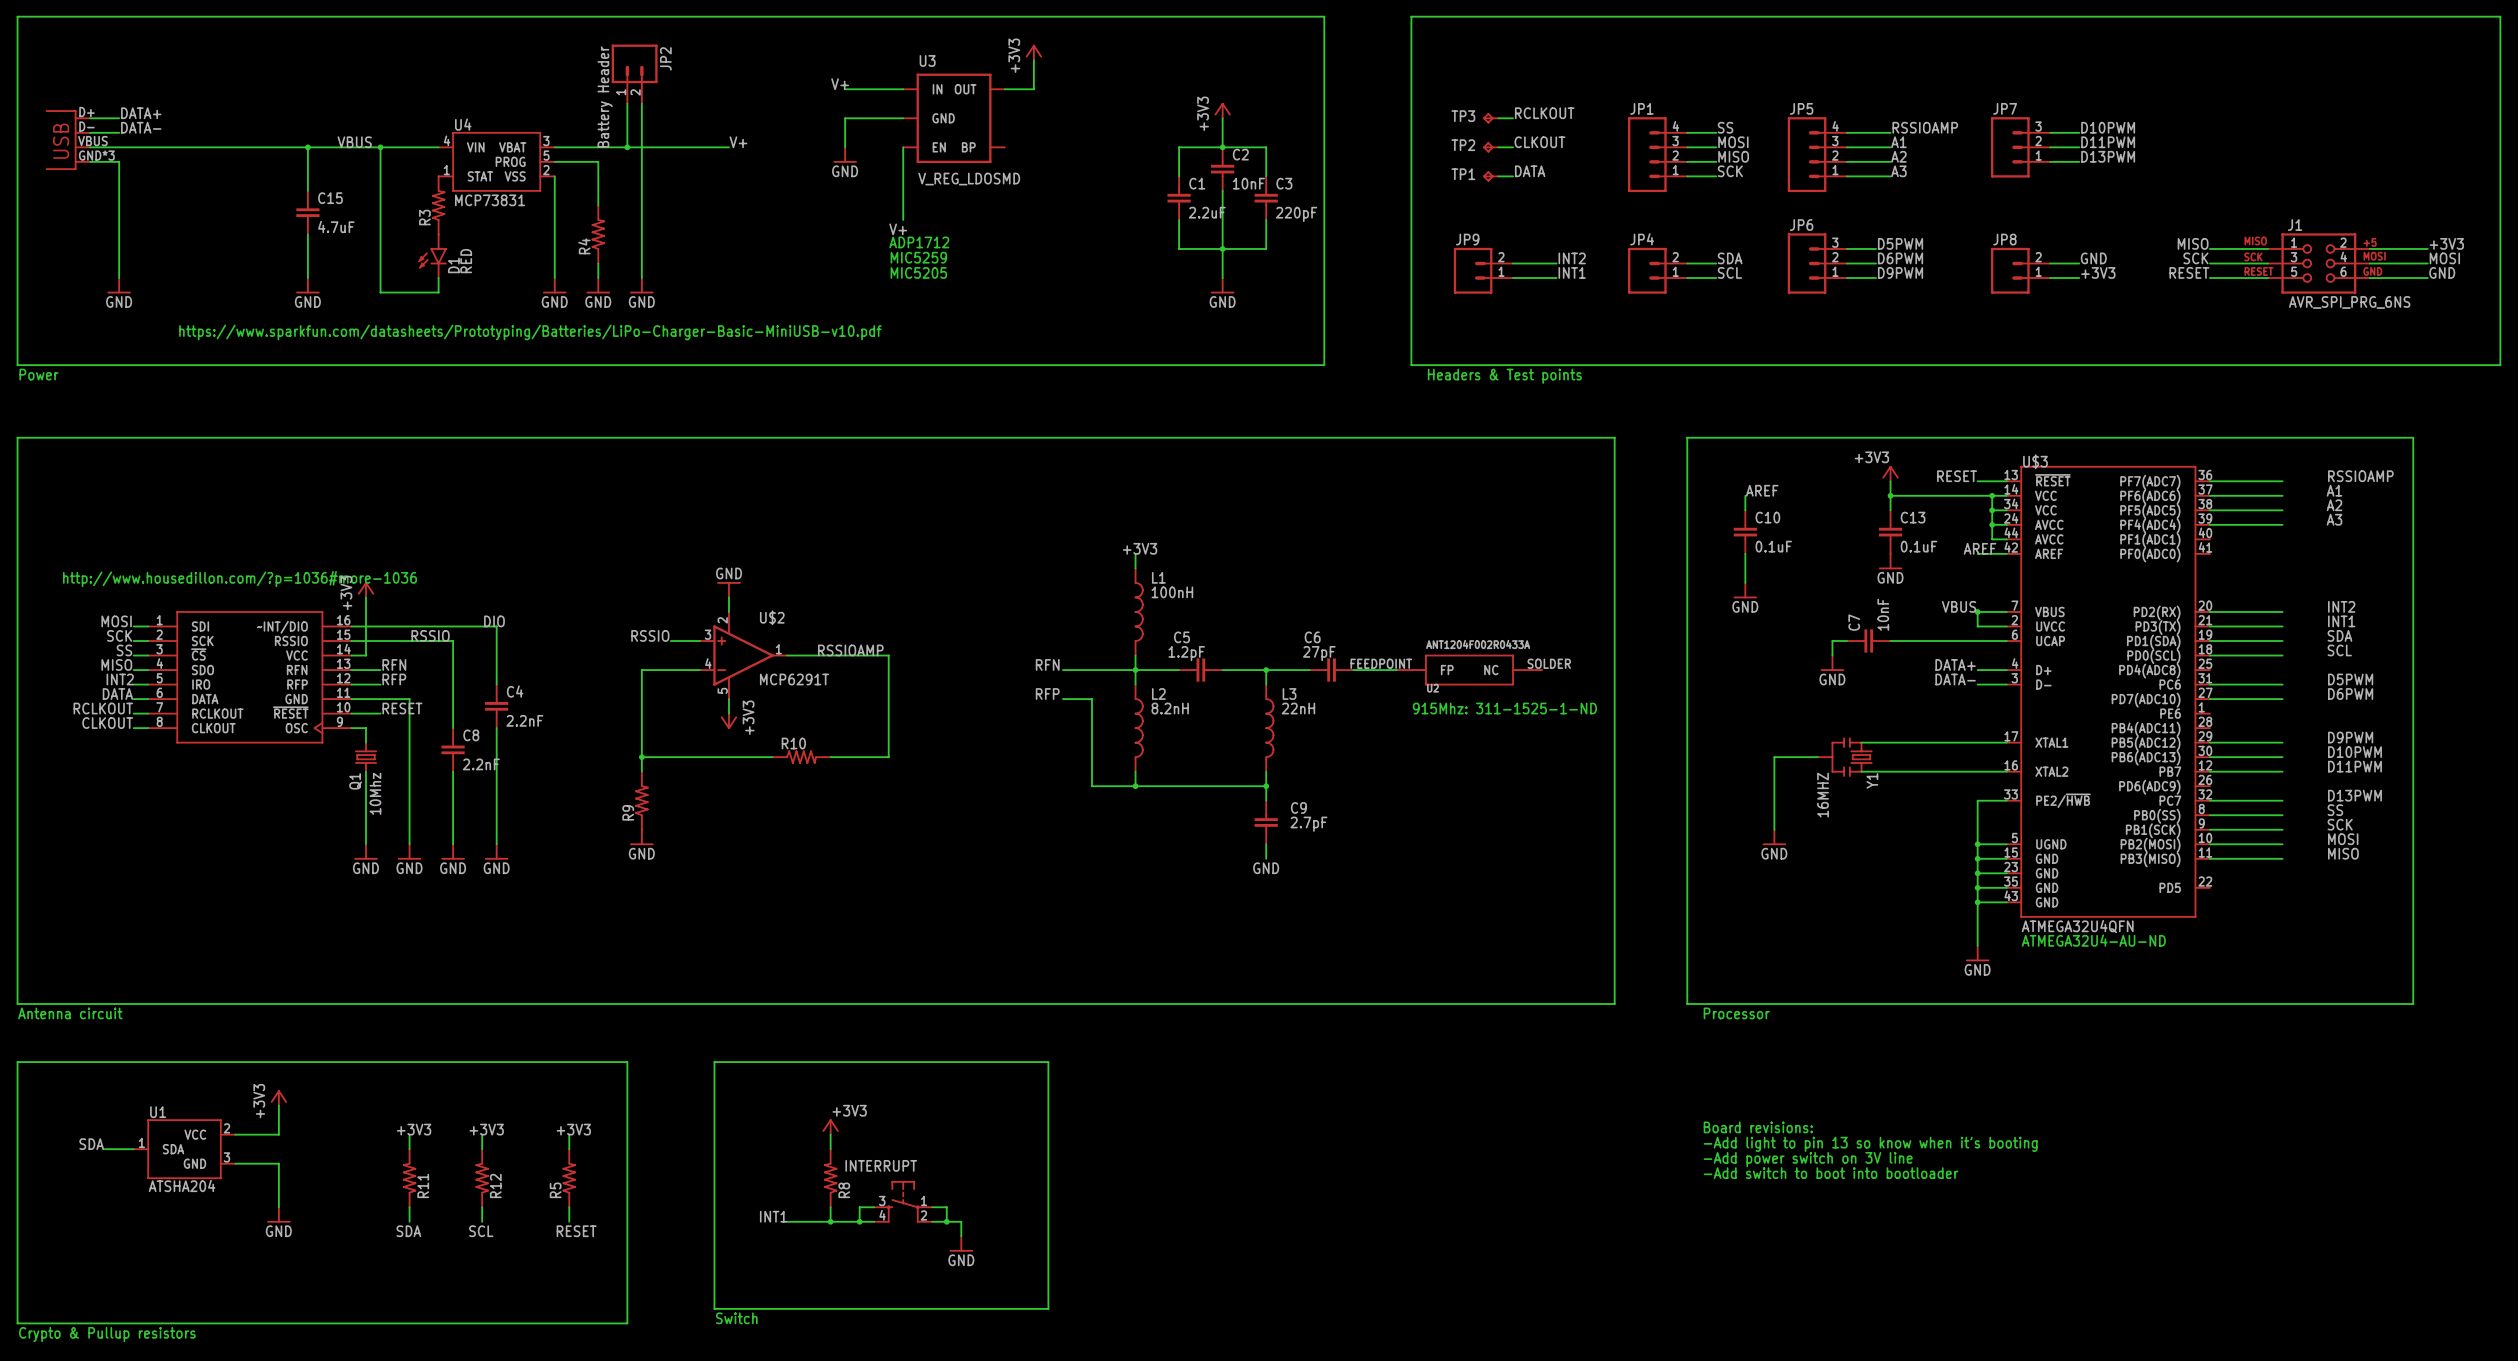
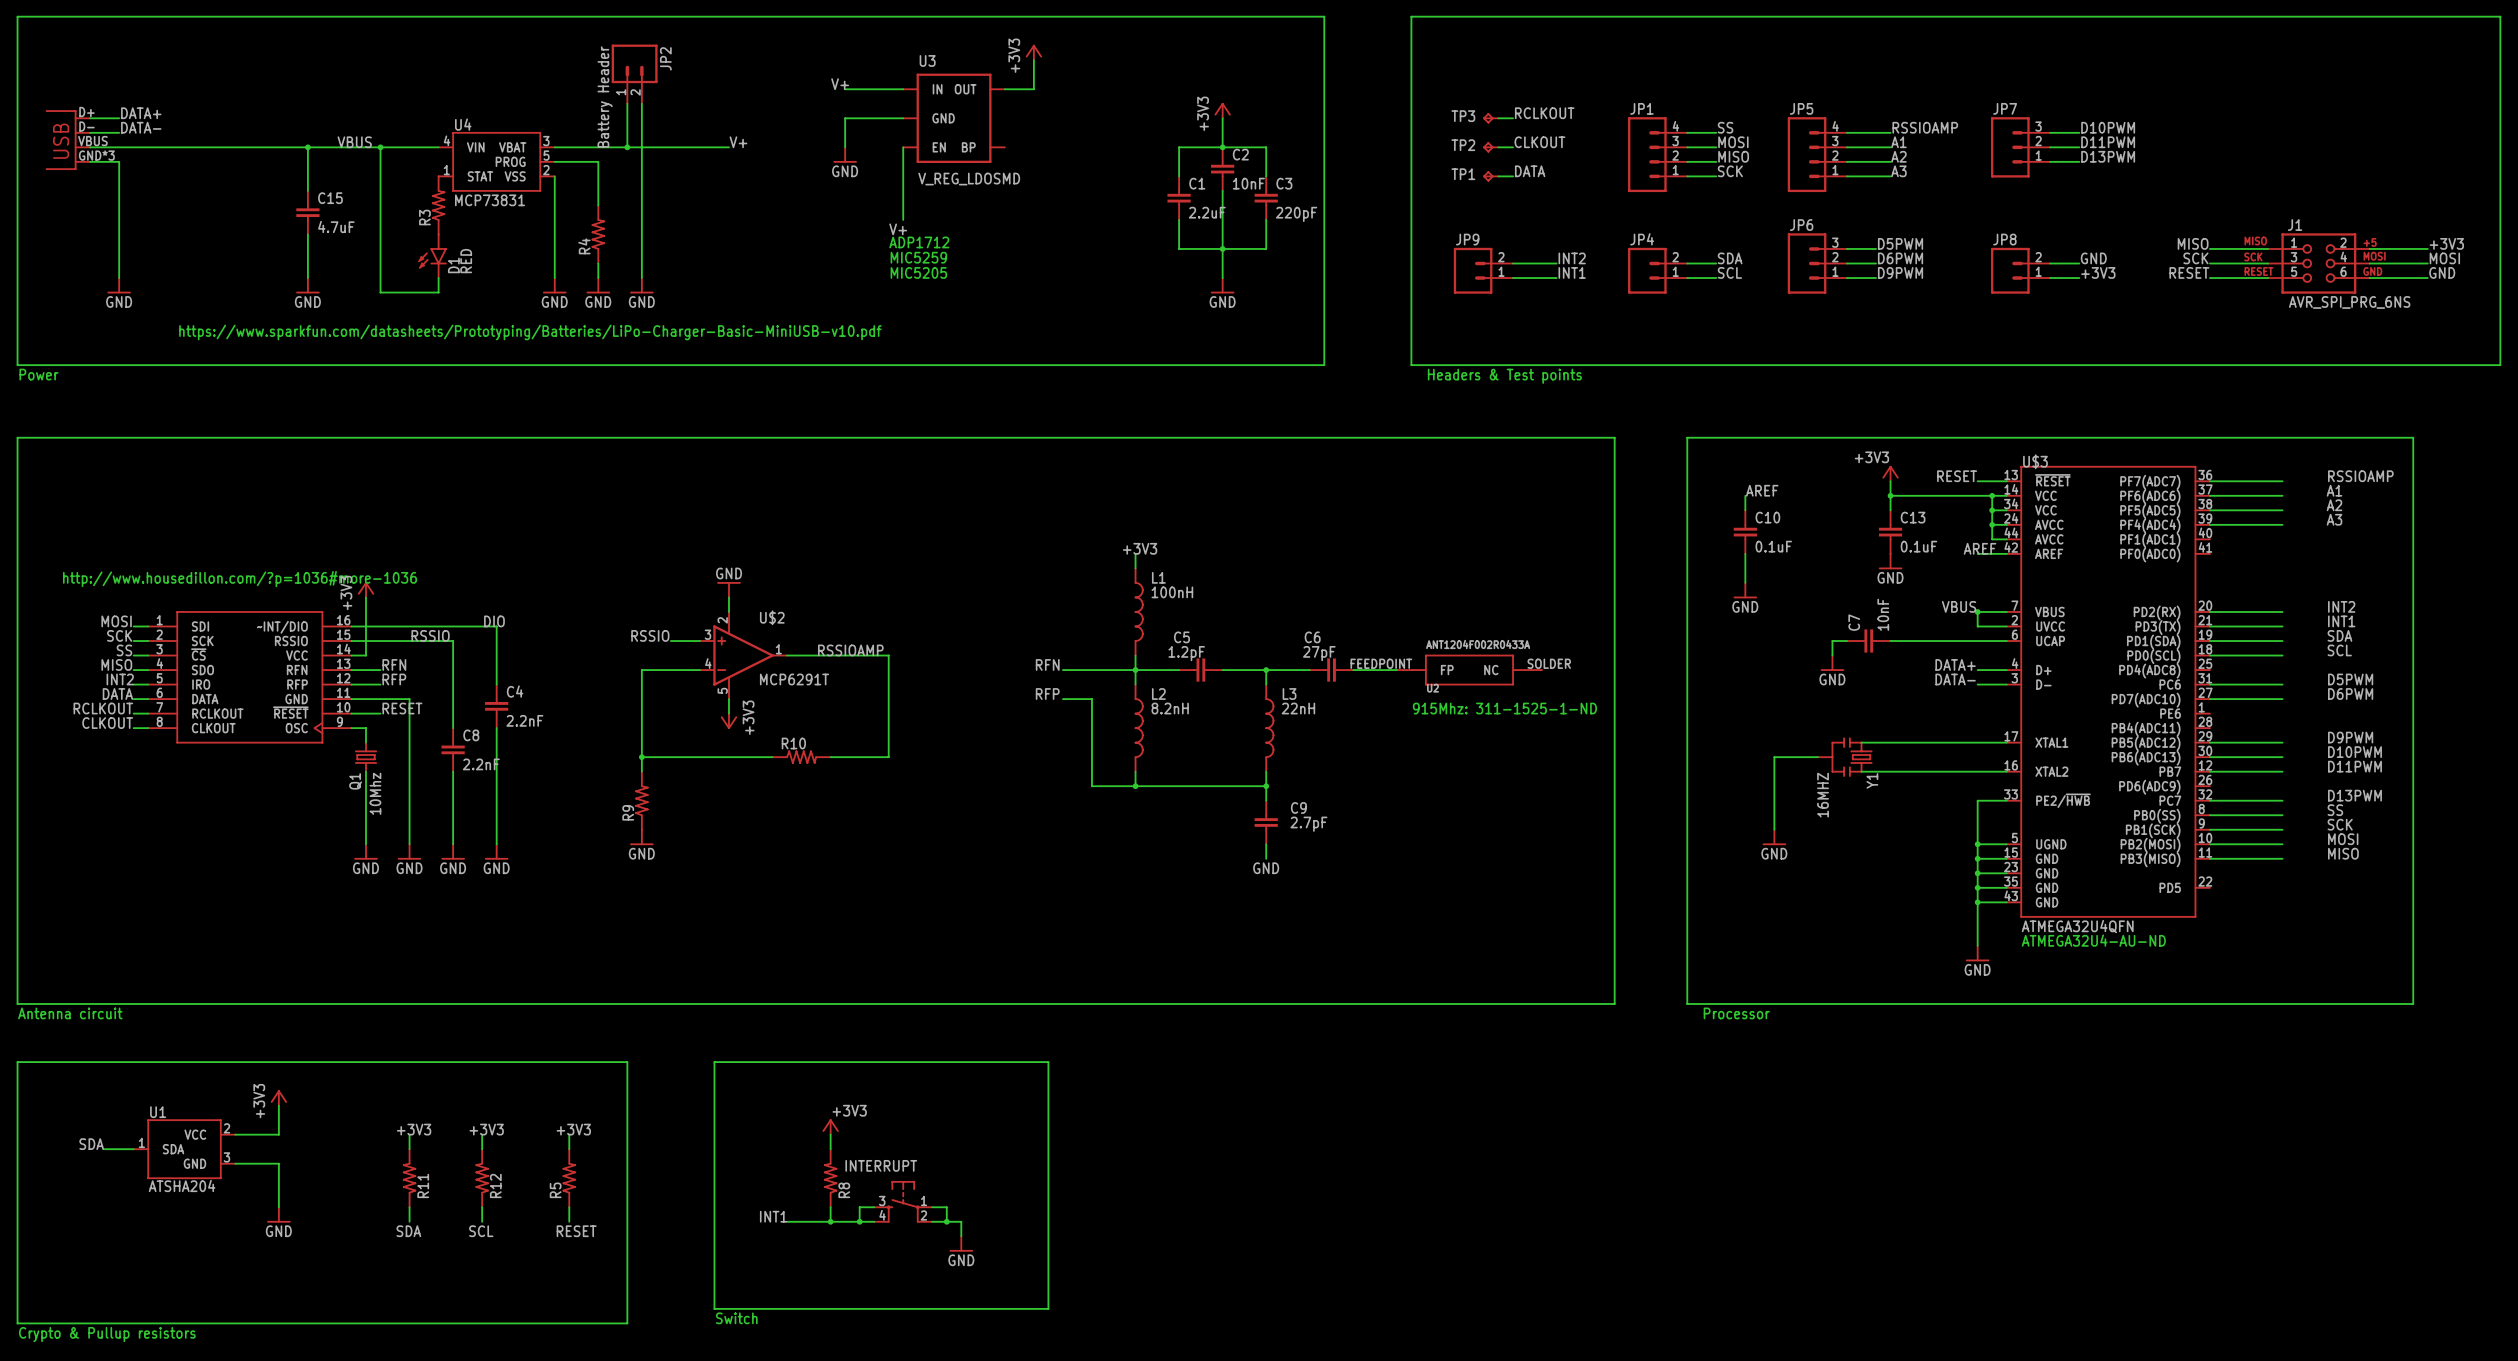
text: Board revisions: (1758, 1127) -> none
text: -Add light to pin 13 so know when it's booting (1870, 1144) -> none
text: -Add power switch on 3V line (1808, 1159) -> none
text: -Add switch to boot into bootloader (1831, 1173) -> none

